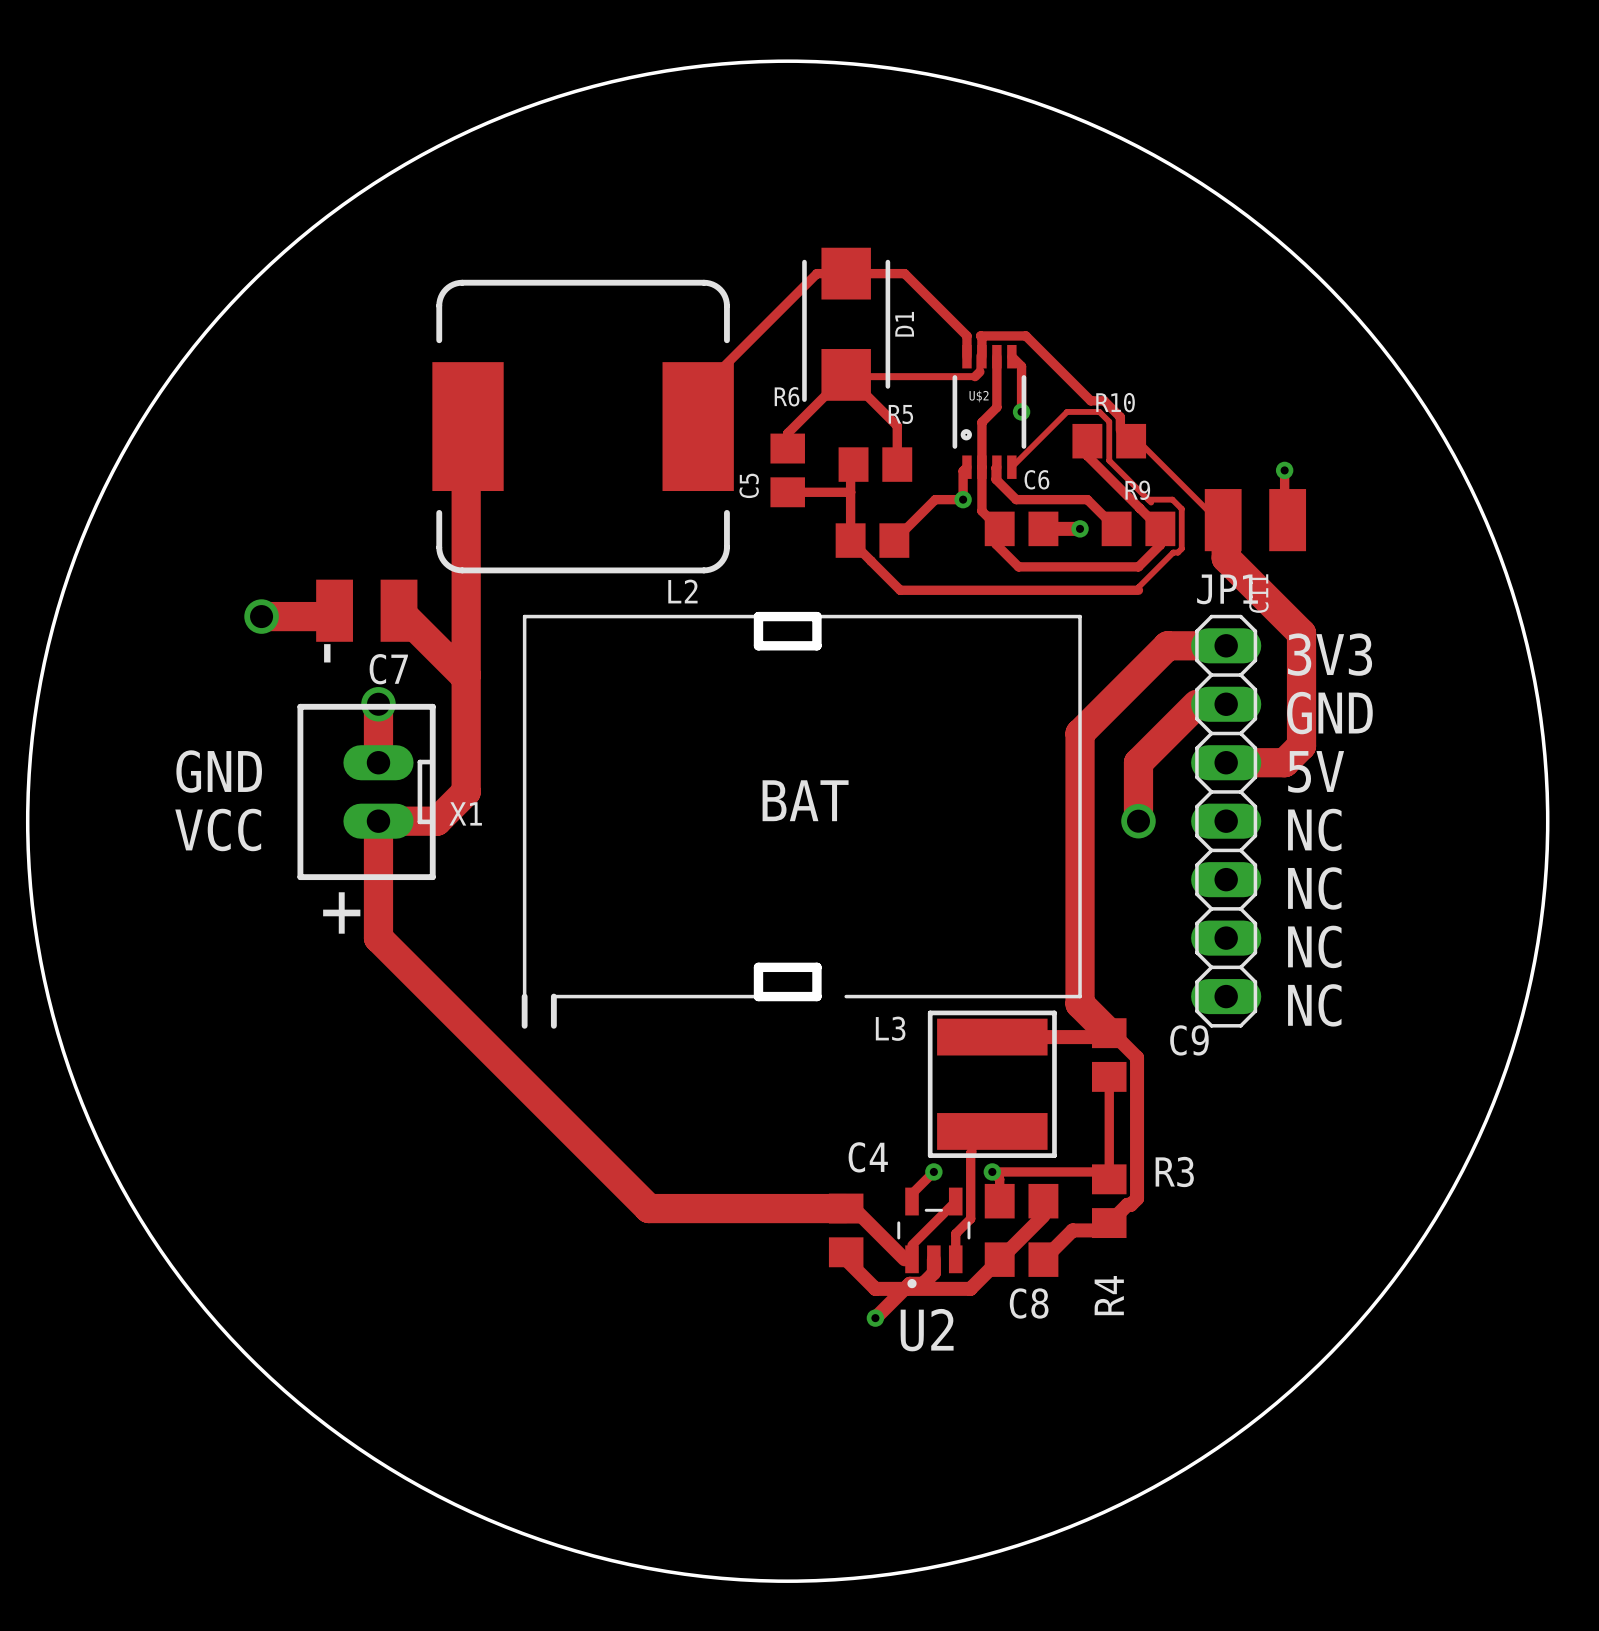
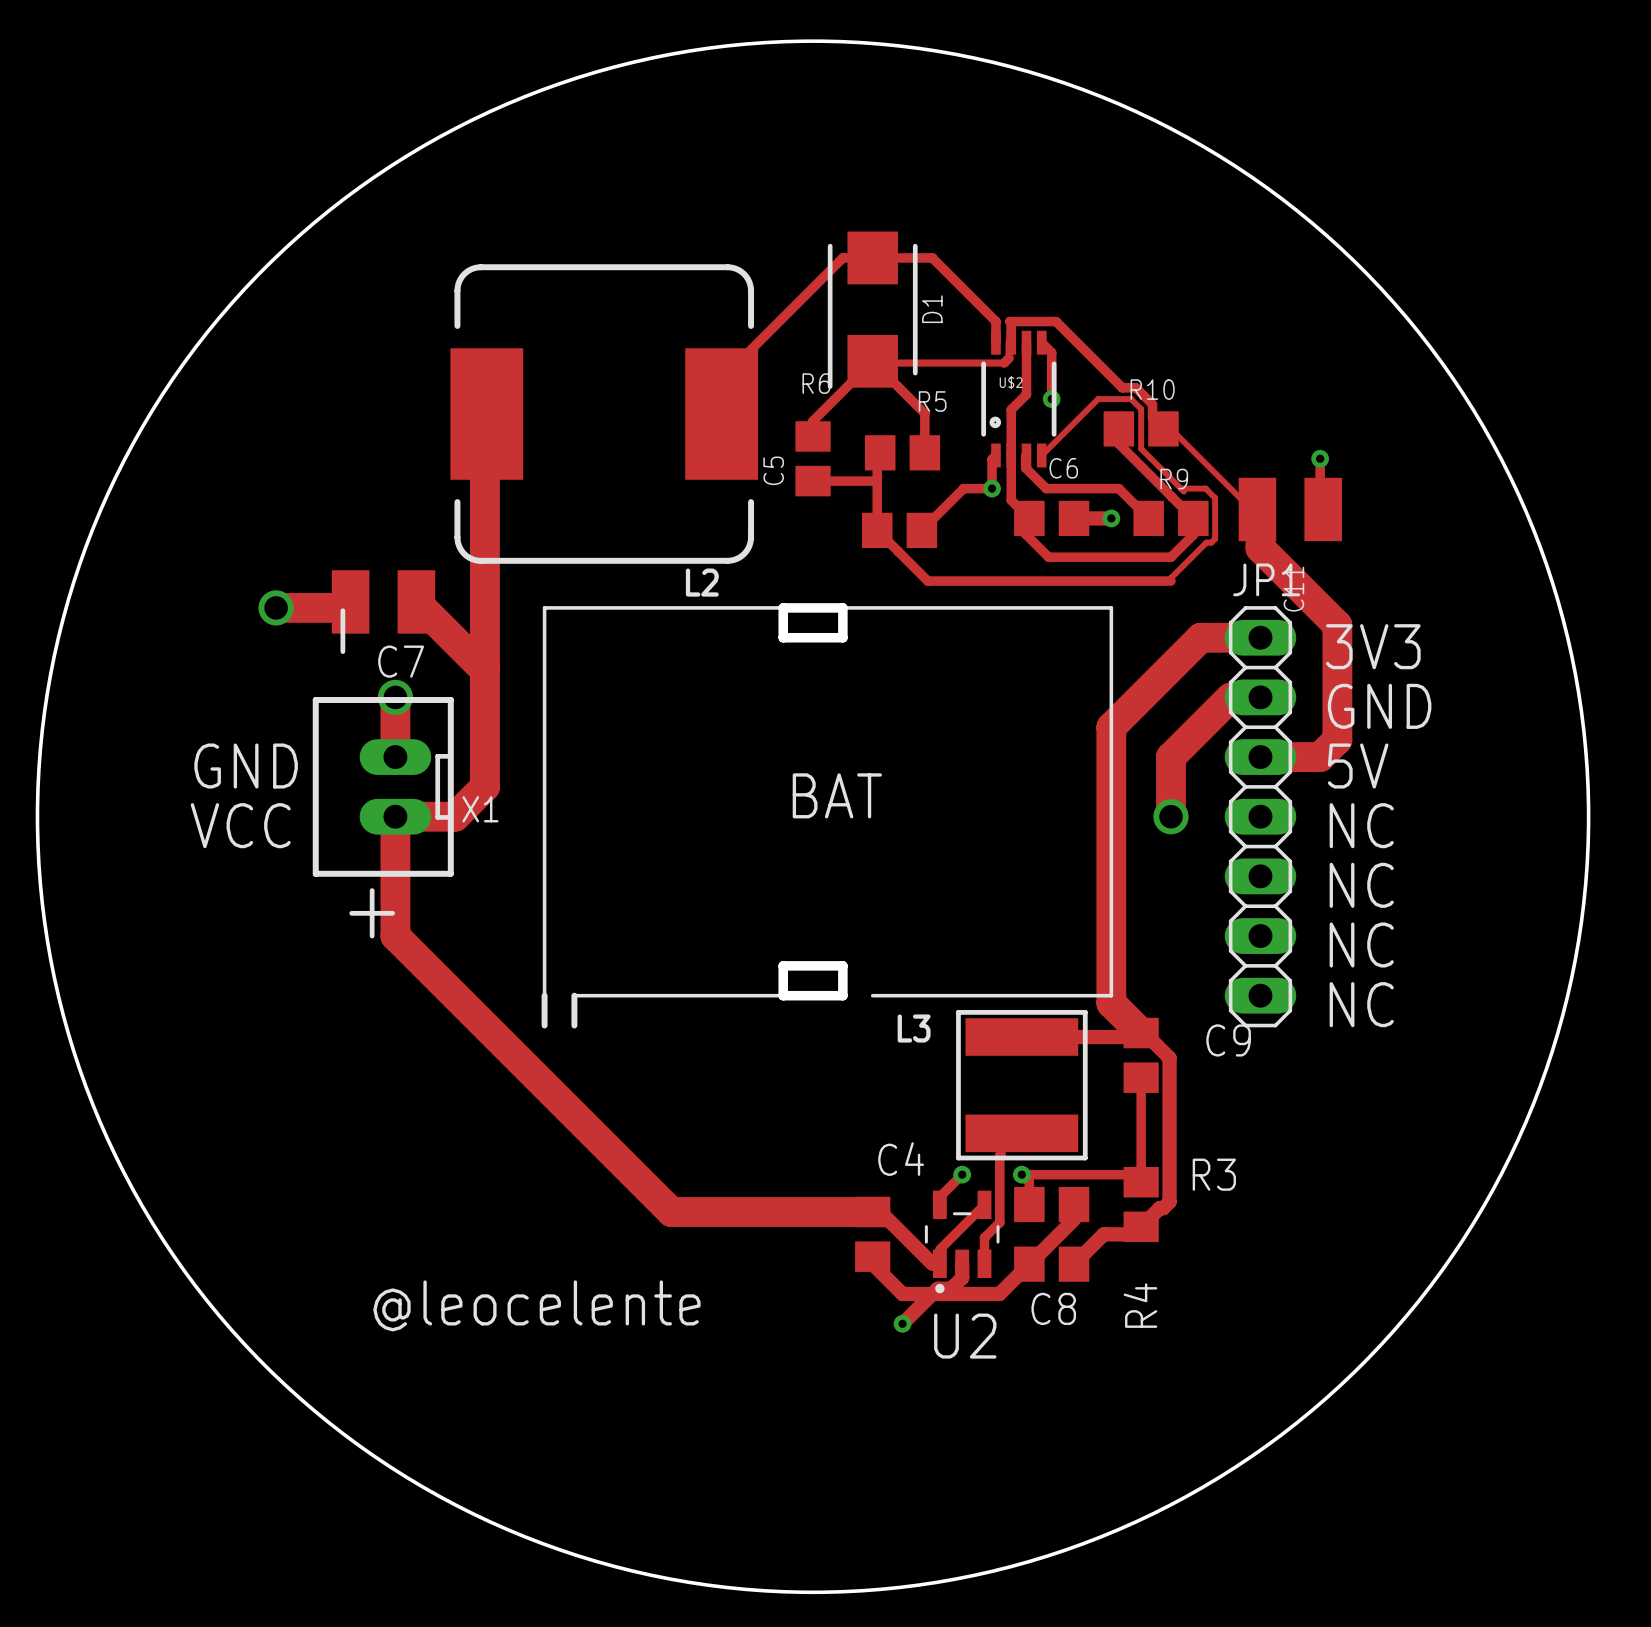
text: none -> @leocelente (536, 1305)

